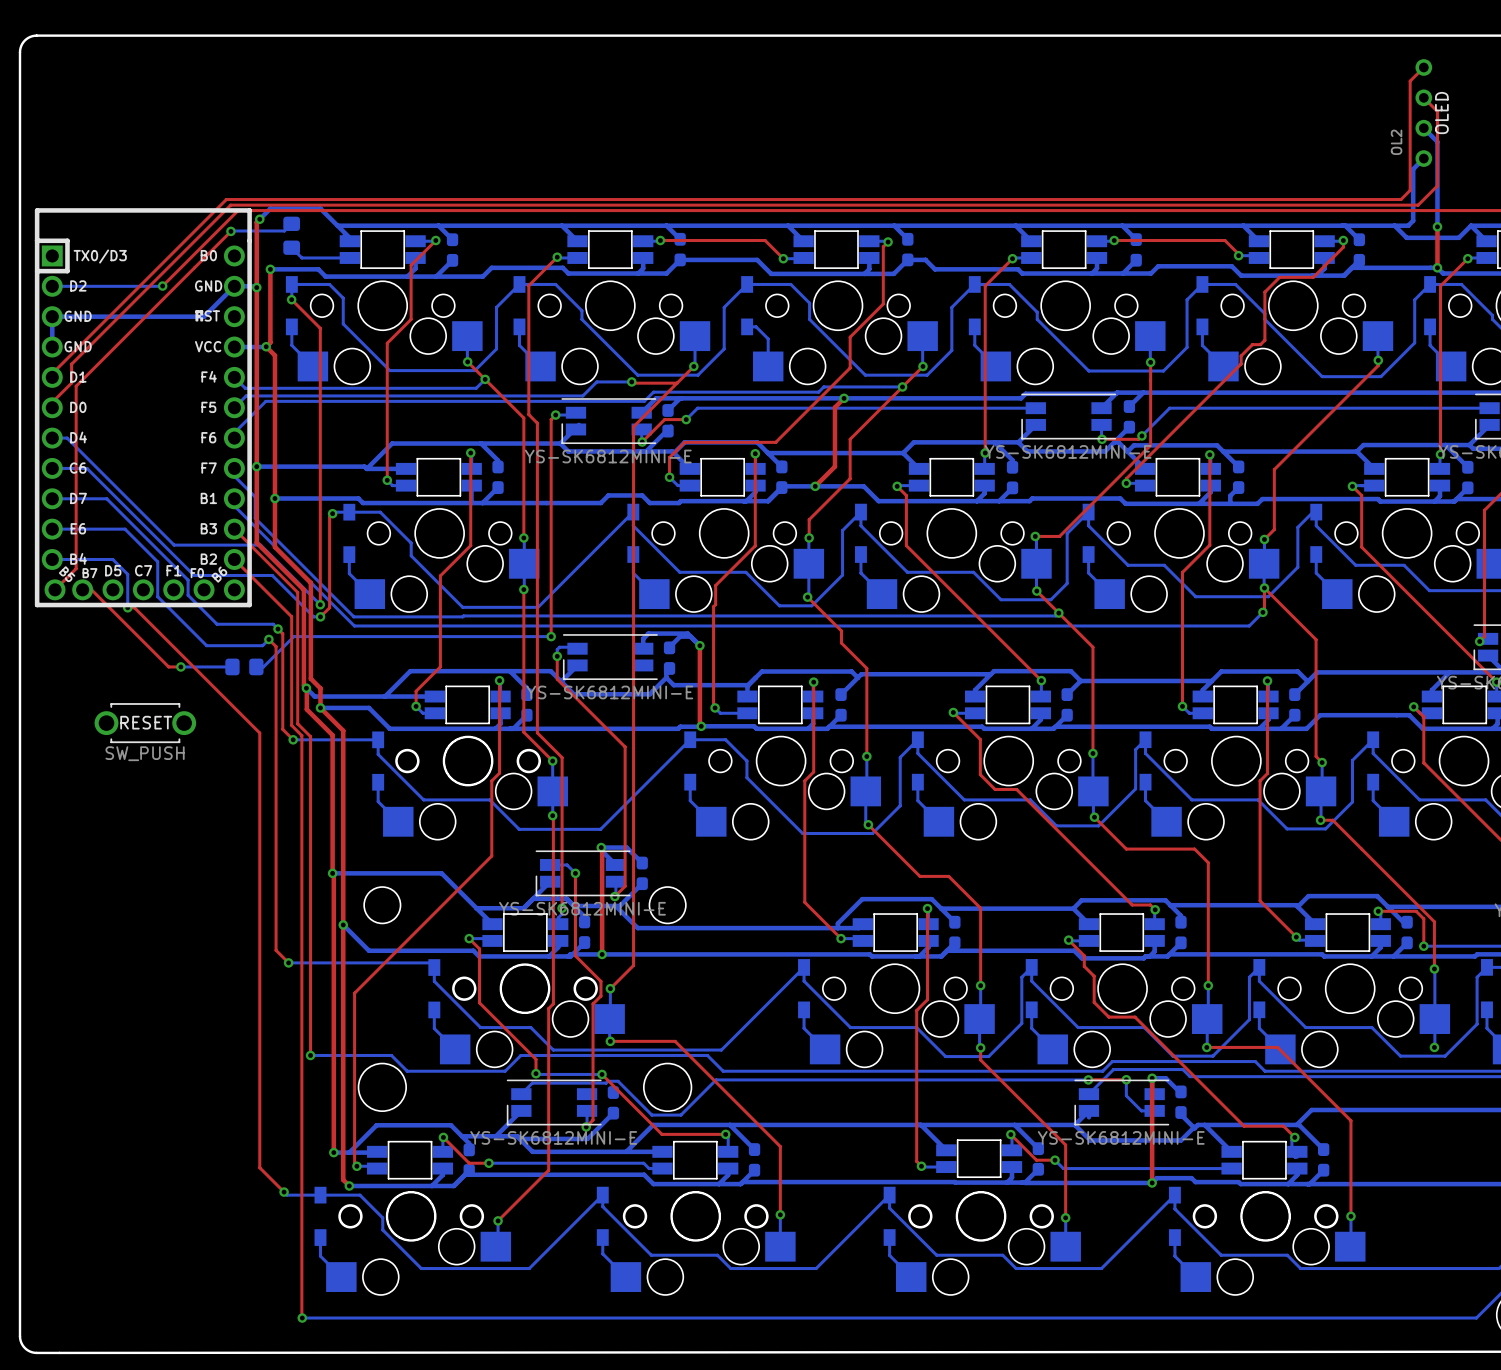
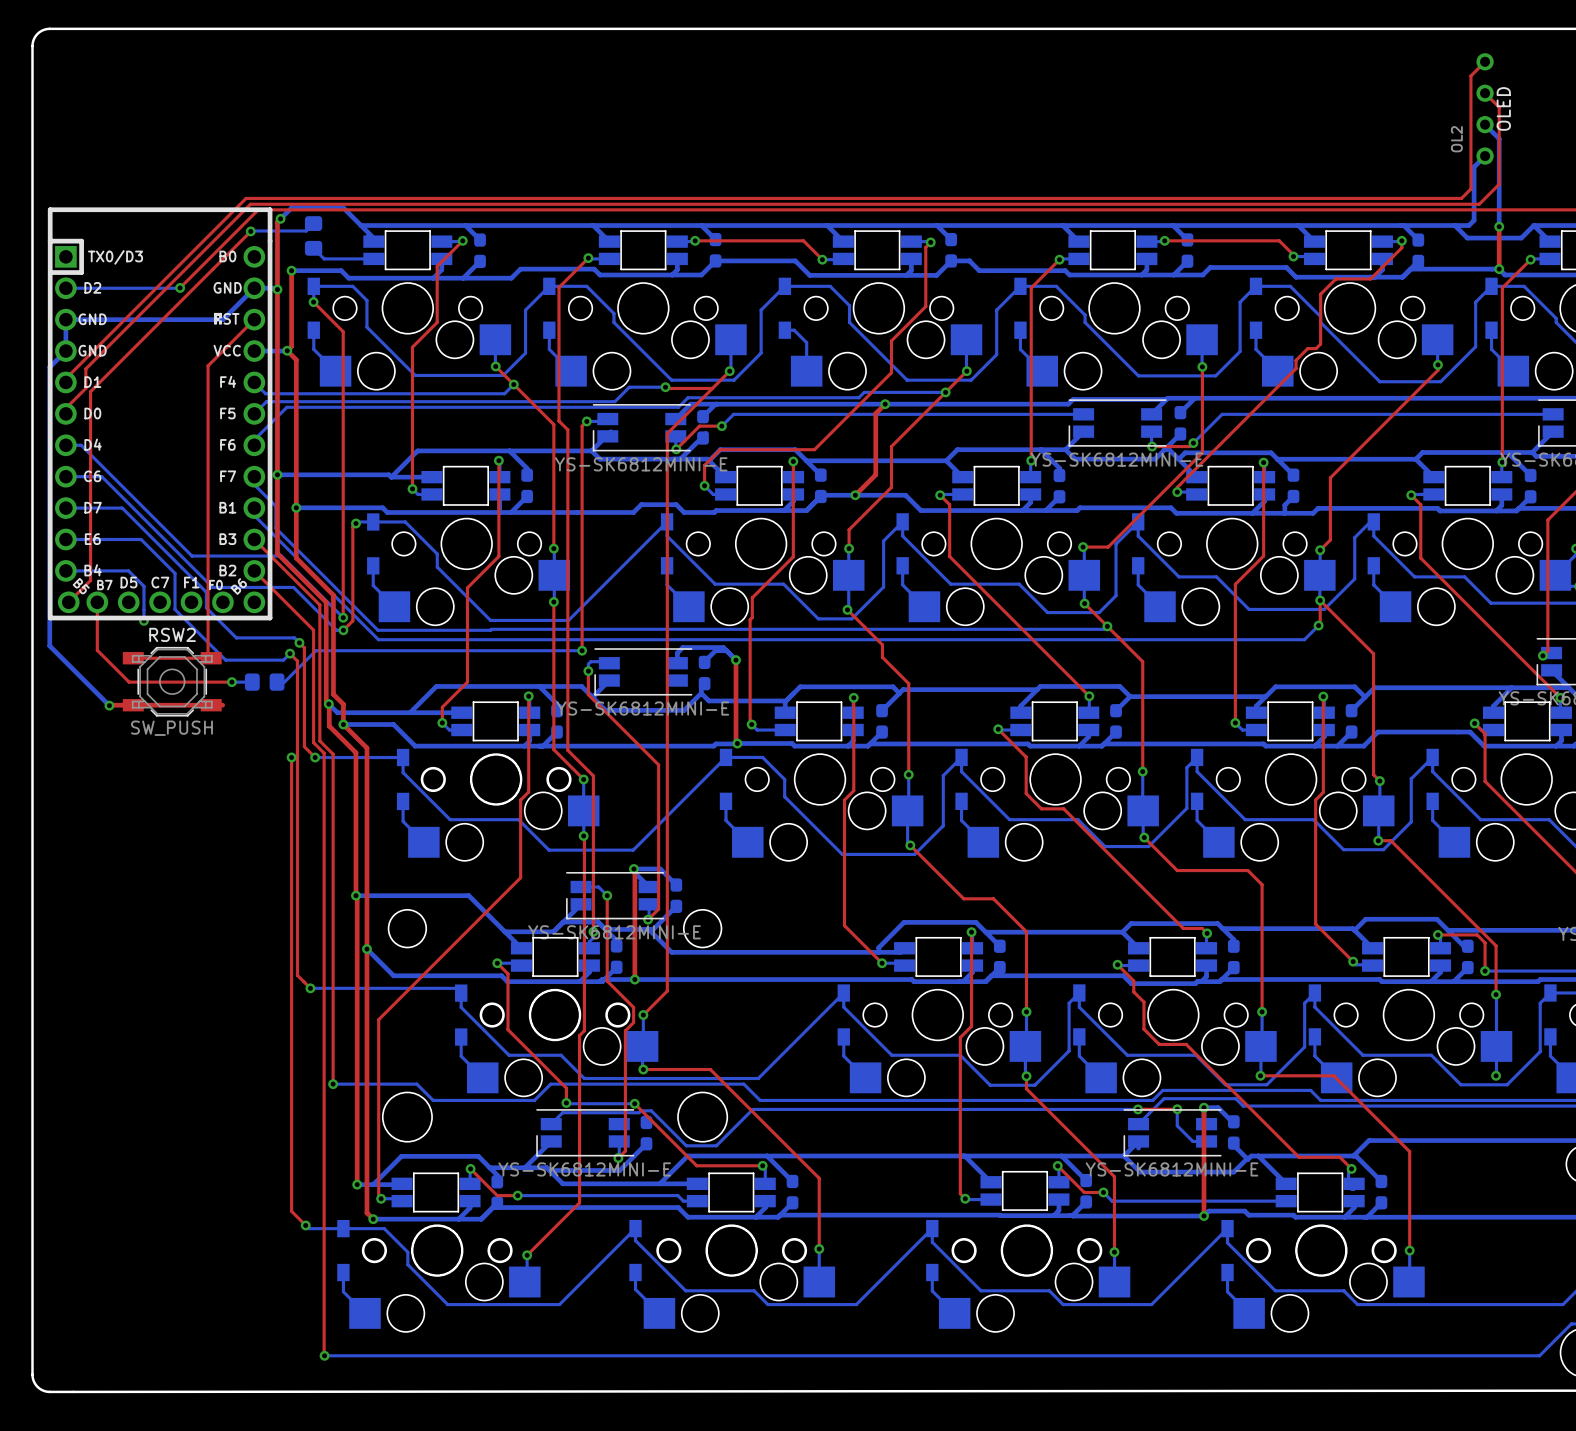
top track: none -> (254, 319) (208, 365) (208, 655) (211, 658) (133, 658)
bottom track: none -> (65, 351) (49, 367) (49, 645) (109, 705)
top track: (82, 589) (91, 589) (168, 666) -> (97, 602) (97, 650) (129, 682) (186, 682)
top track: (127, 607) (134, 607) (259, 733) (259, 1167) (270, 1178) -> (291, 757) (291, 1211)
RSW2: none -> SW_PUSH (172, 681)
bottom track: (180, 666) (212, 666) -> none
top track: none -> (198, 682) (231, 682)
via position: (180, 666) -> (231, 682)
via: none -> (109, 705)
top track: none -> (222, 705) (109, 705)
part: SW_PUSH (145, 723) -> none
via: none -> (291, 757)

